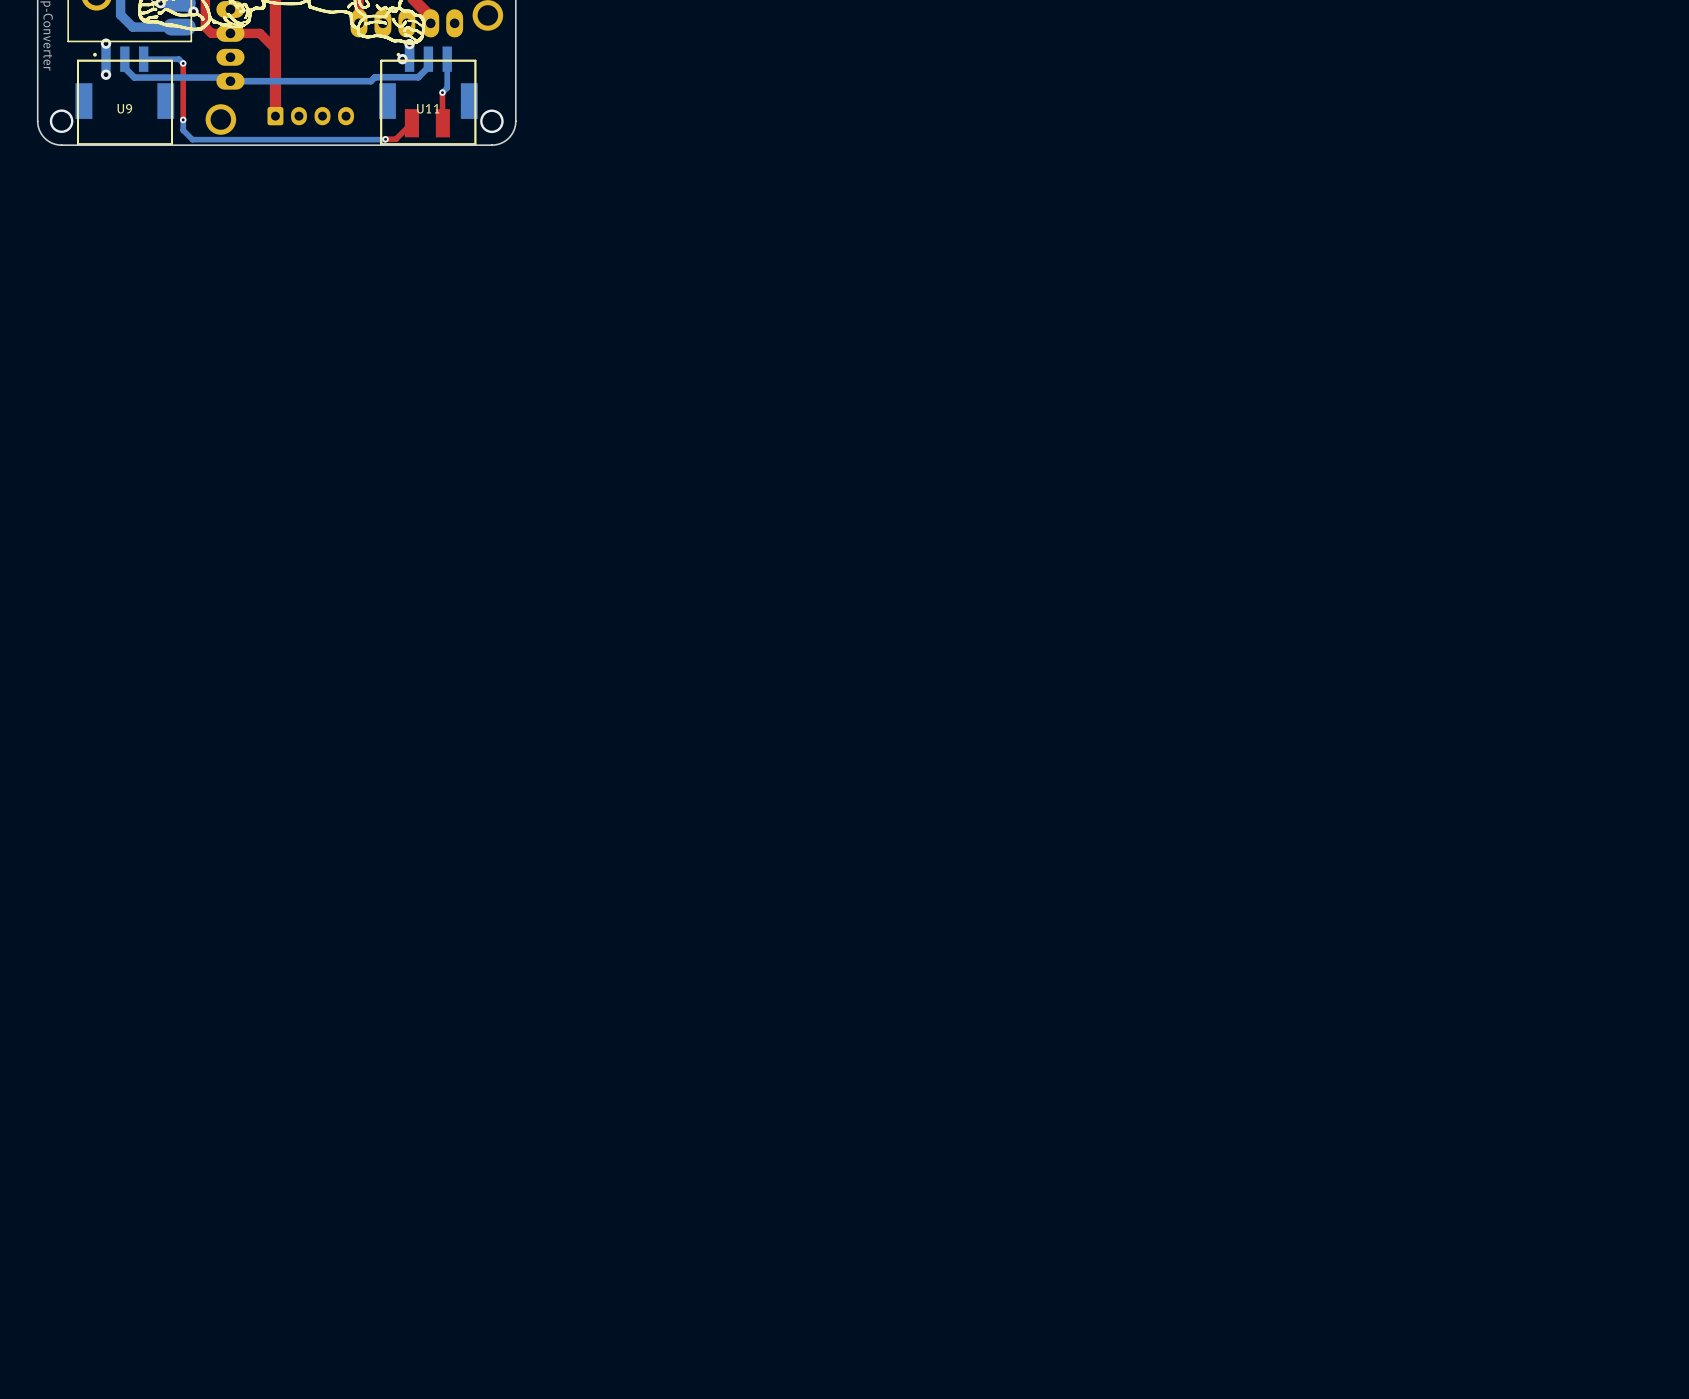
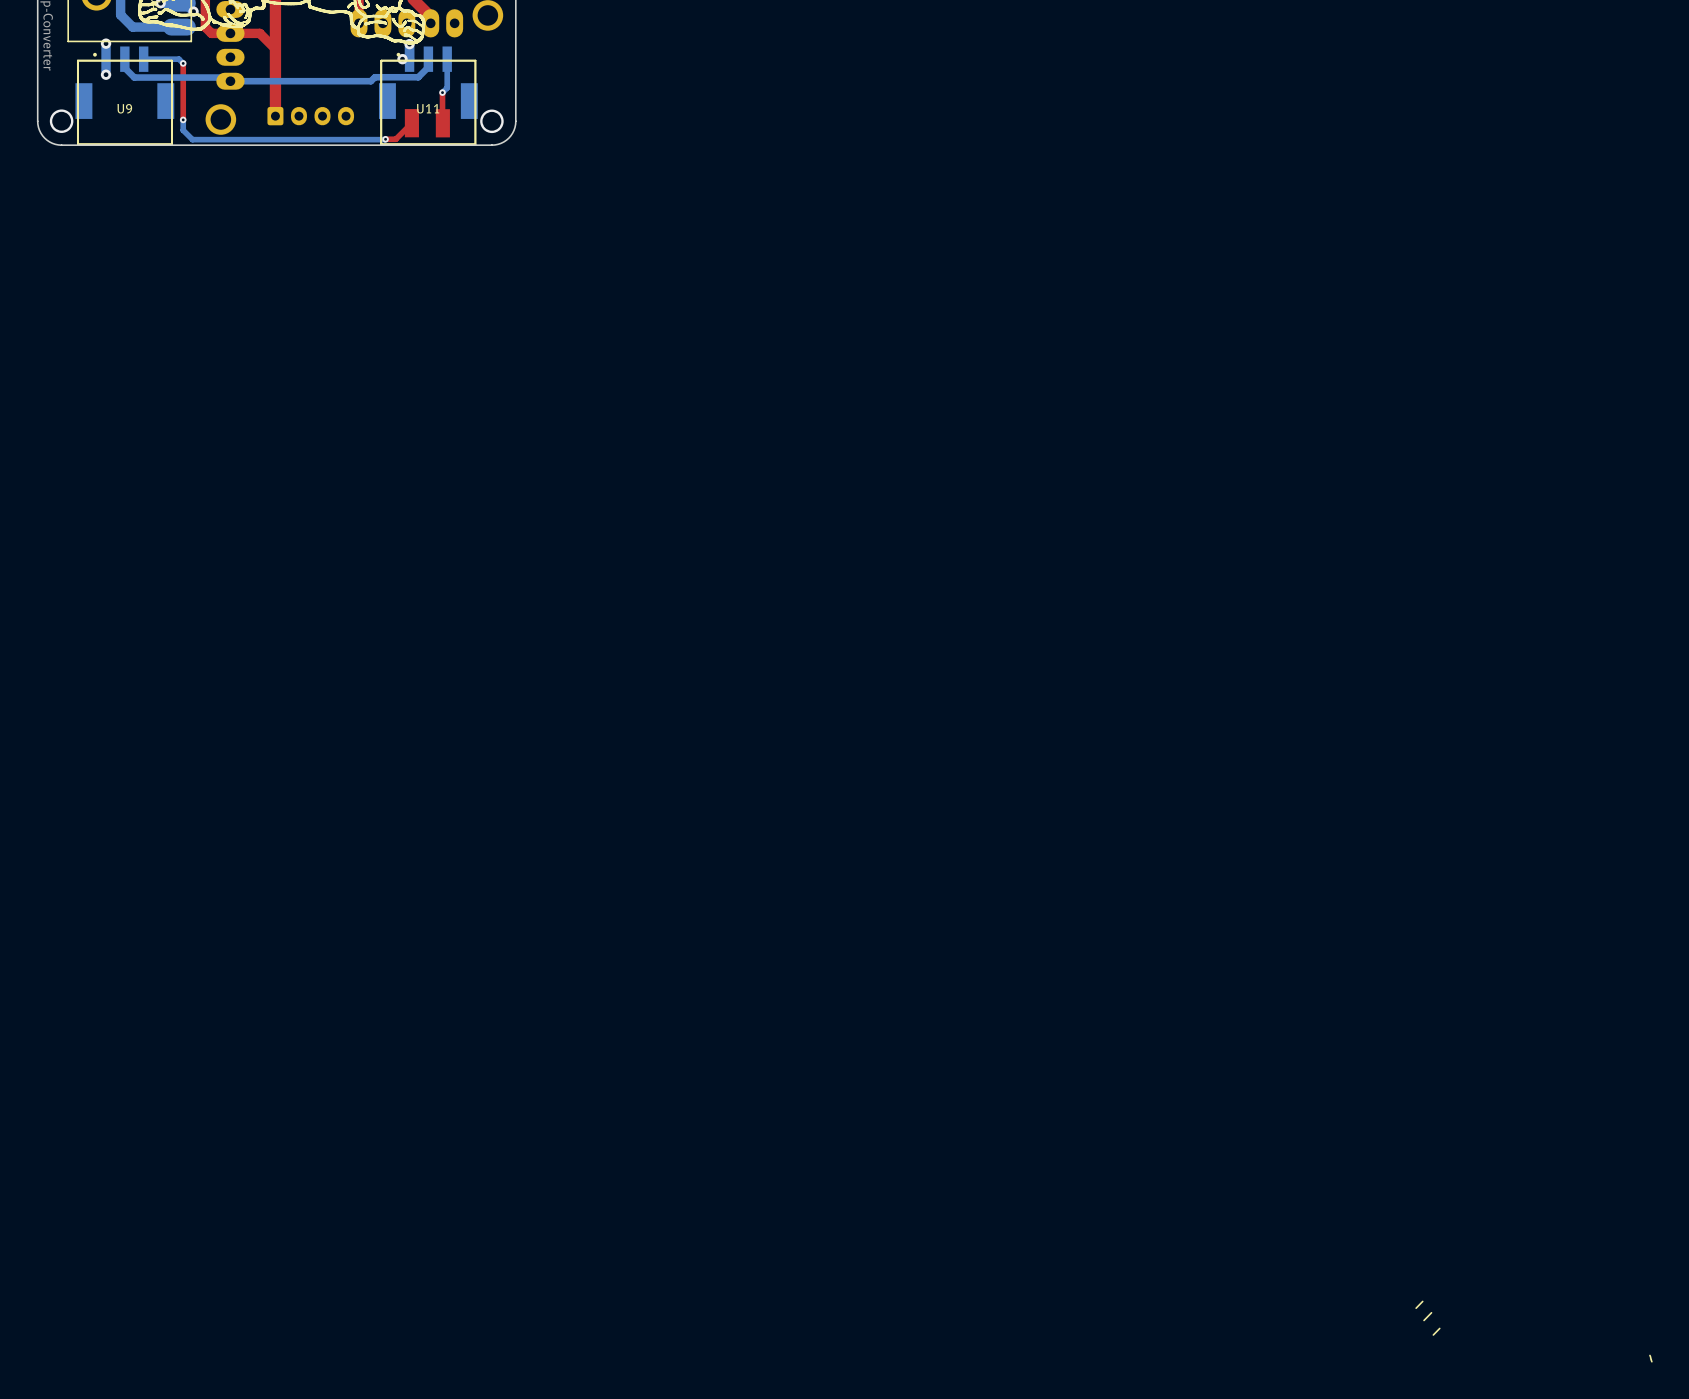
line: none -> (1422, 1301) (1416, 1308)
line: none -> (1431, 1312) (1424, 1320)
line: none -> (1439, 1328) (1433, 1334)
line: none -> (1649, 1355) (1650, 1357)
line: none -> (1650, 1357) (1651, 1359)
line: none -> (1651, 1360) (1651, 1361)

